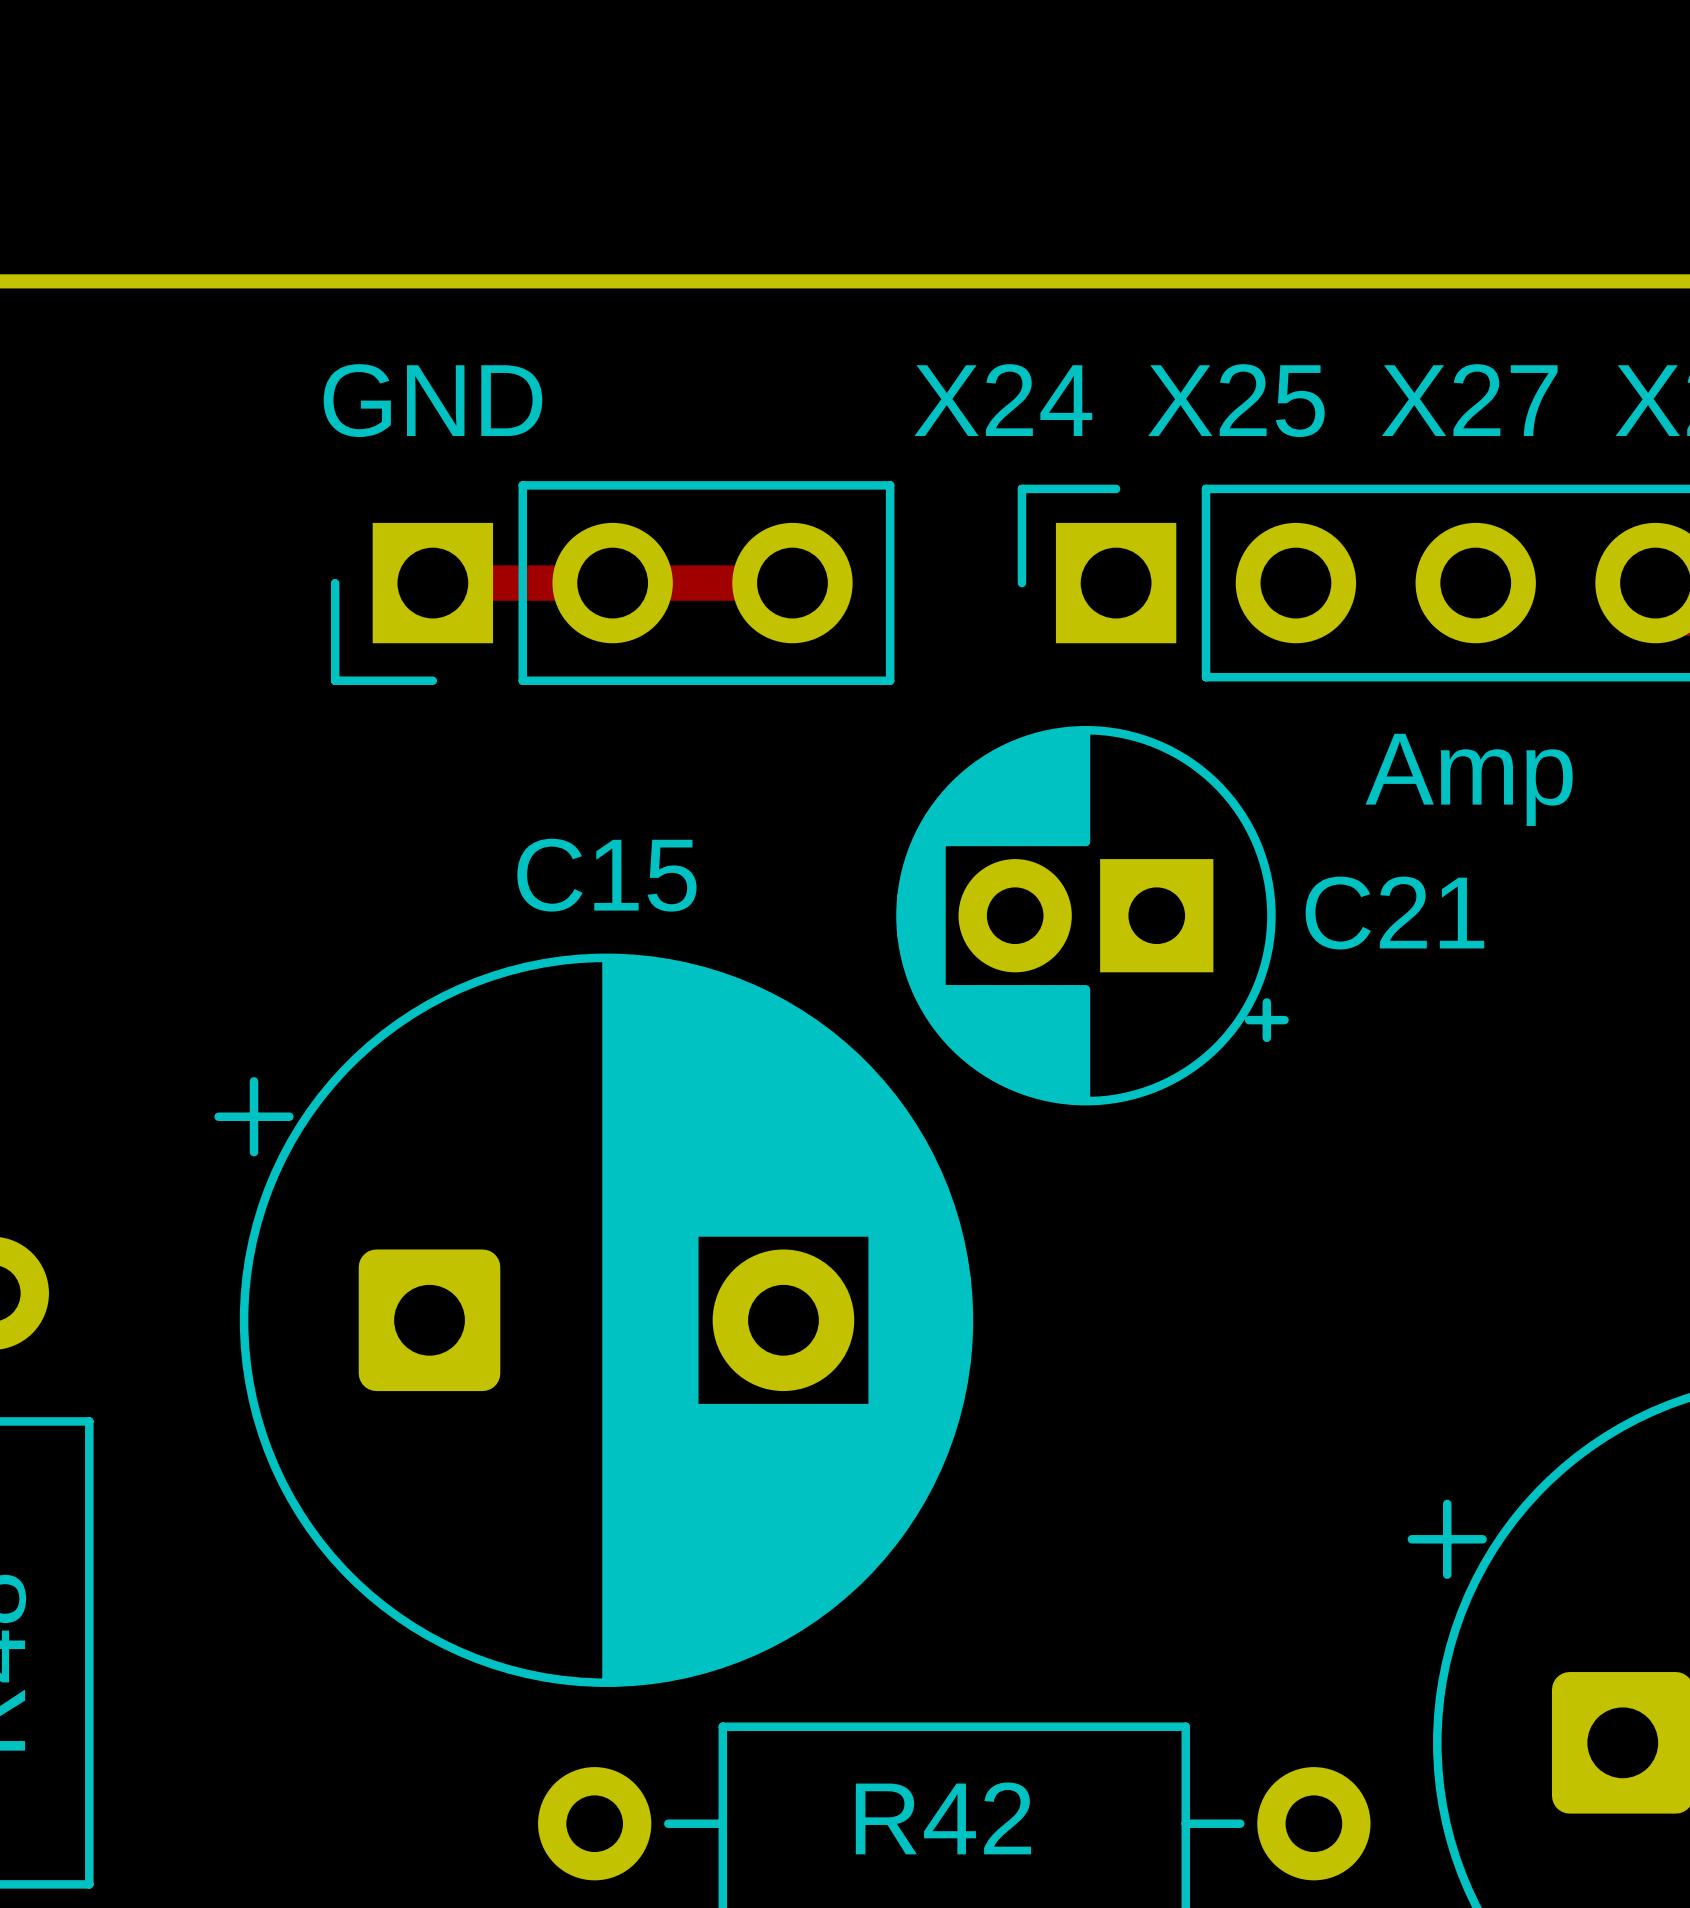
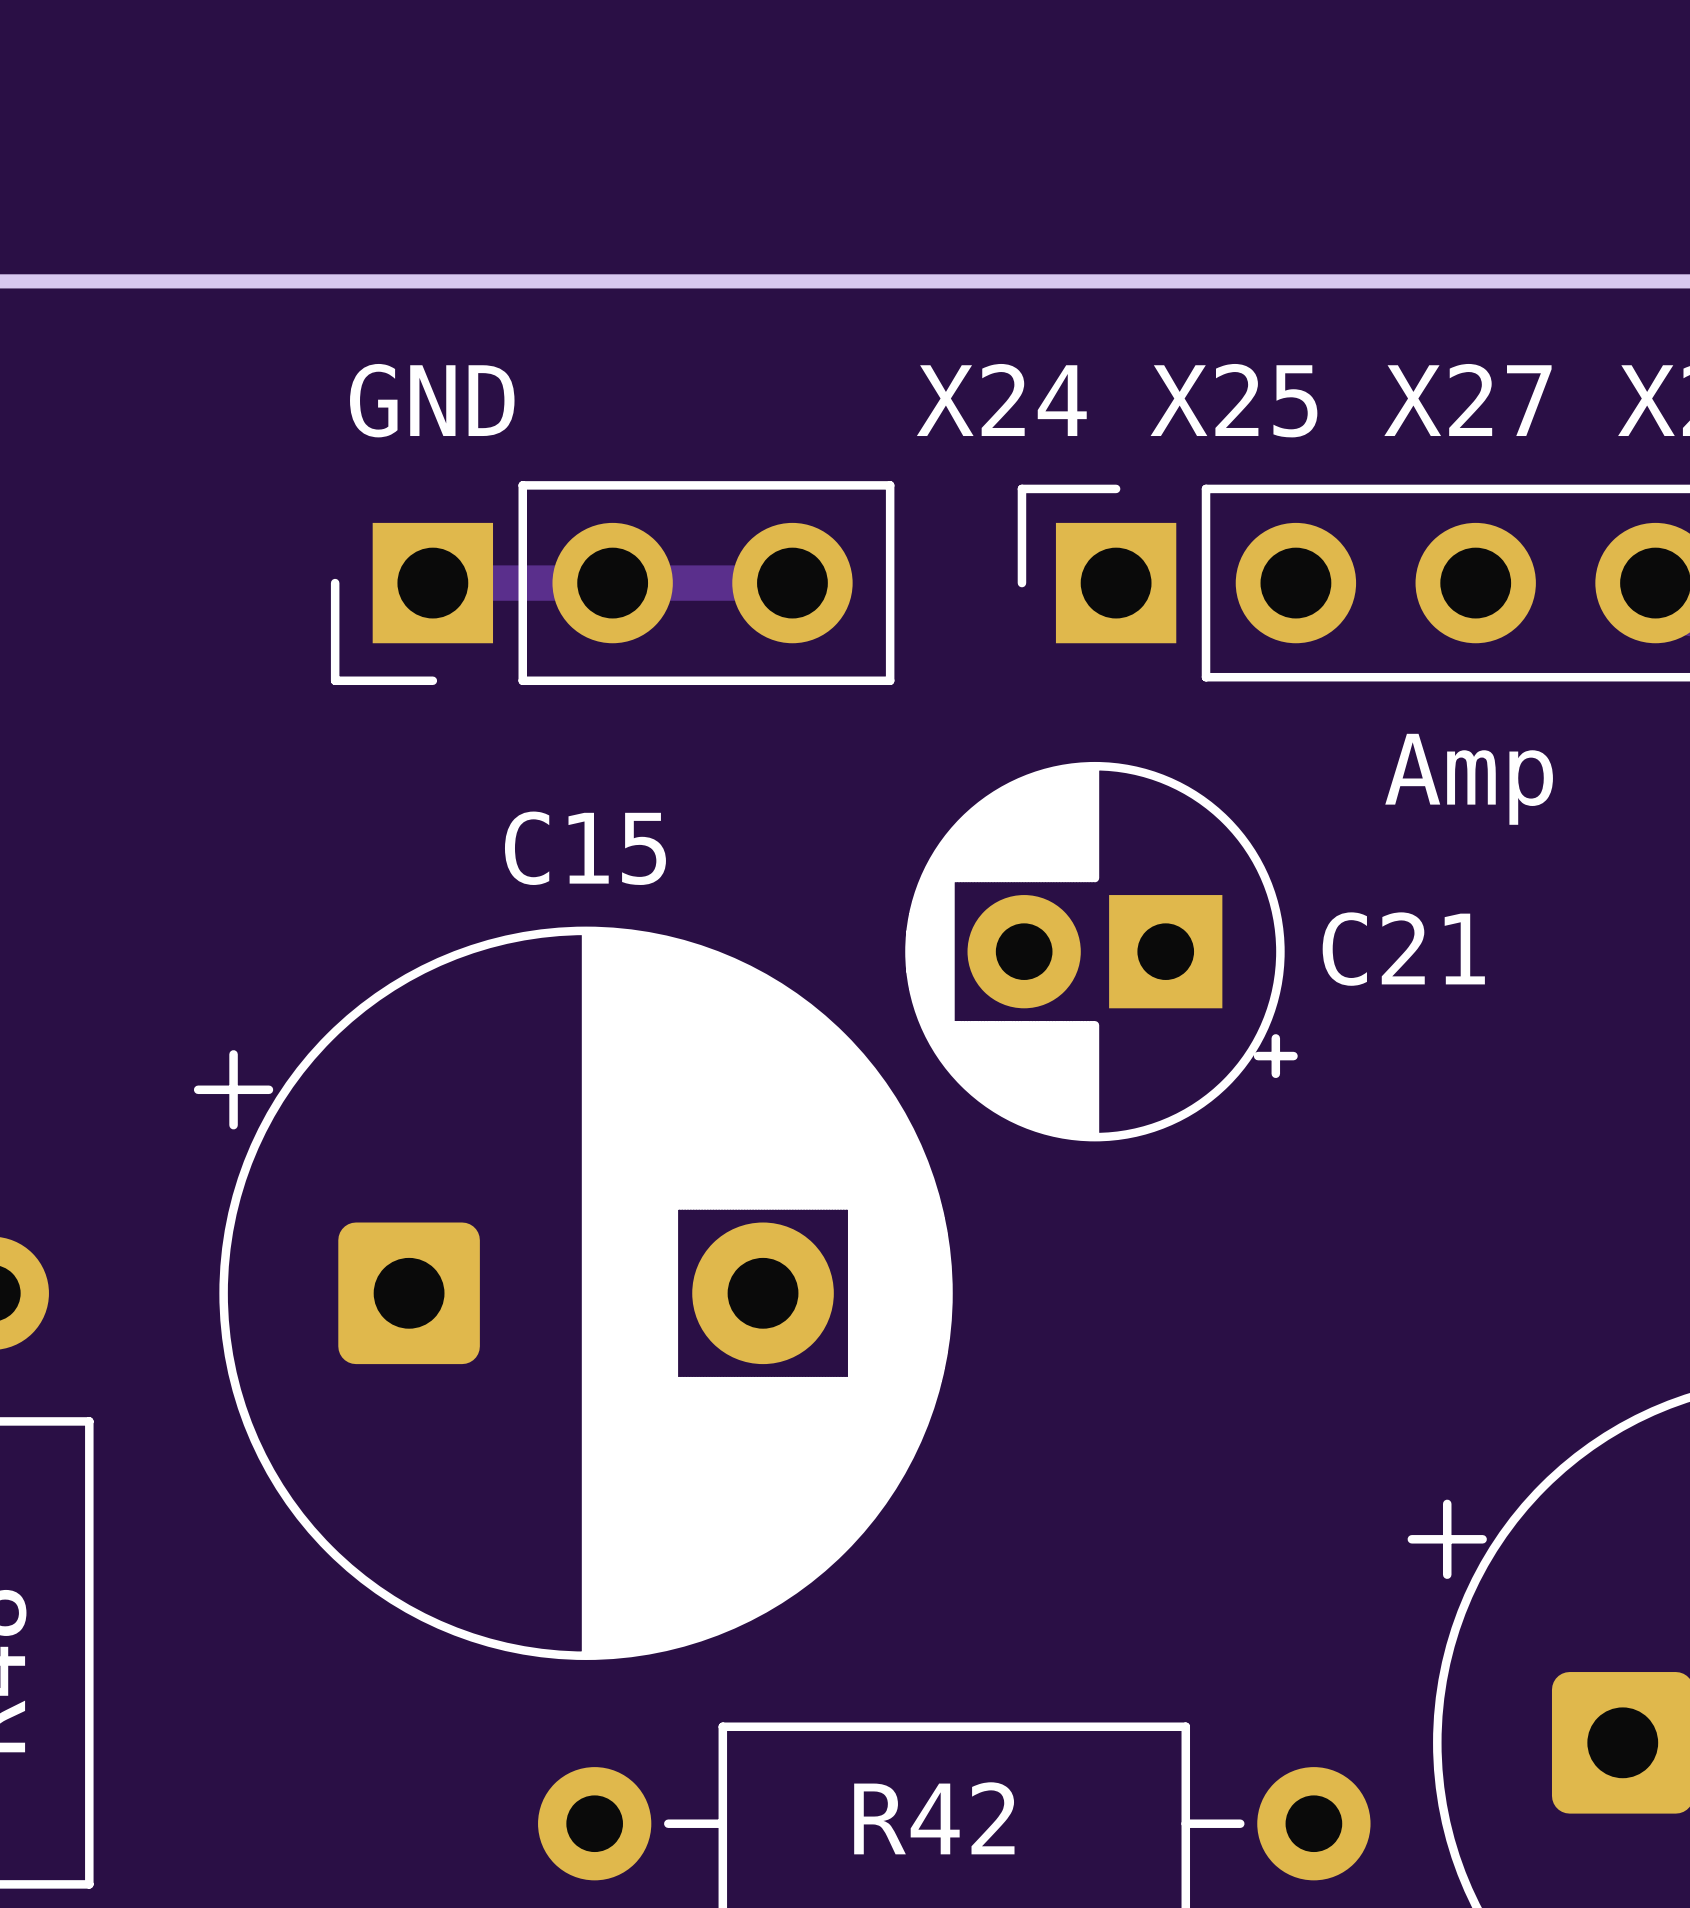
C21 position: (1092, 915) -> (1101, 951)
C15 position: (593, 1320) -> (573, 1293)

